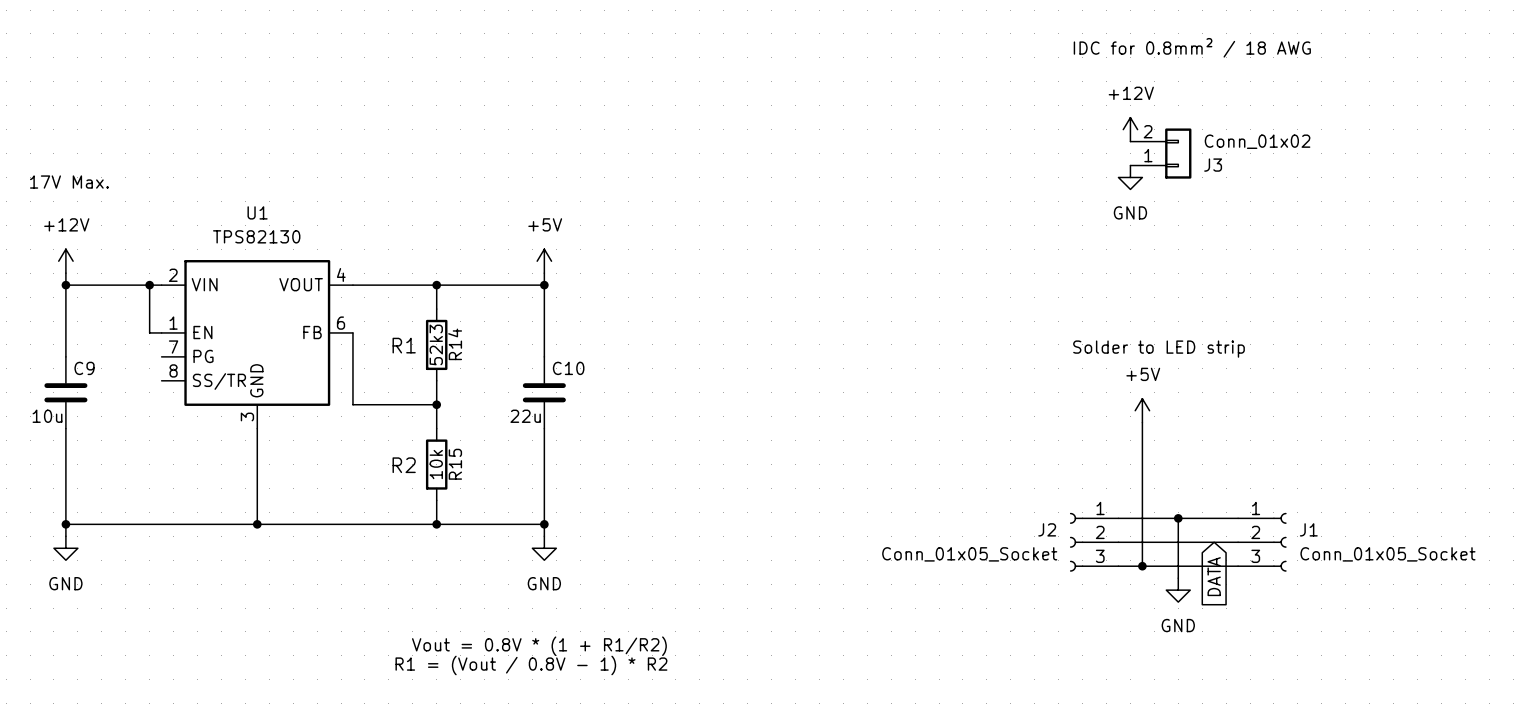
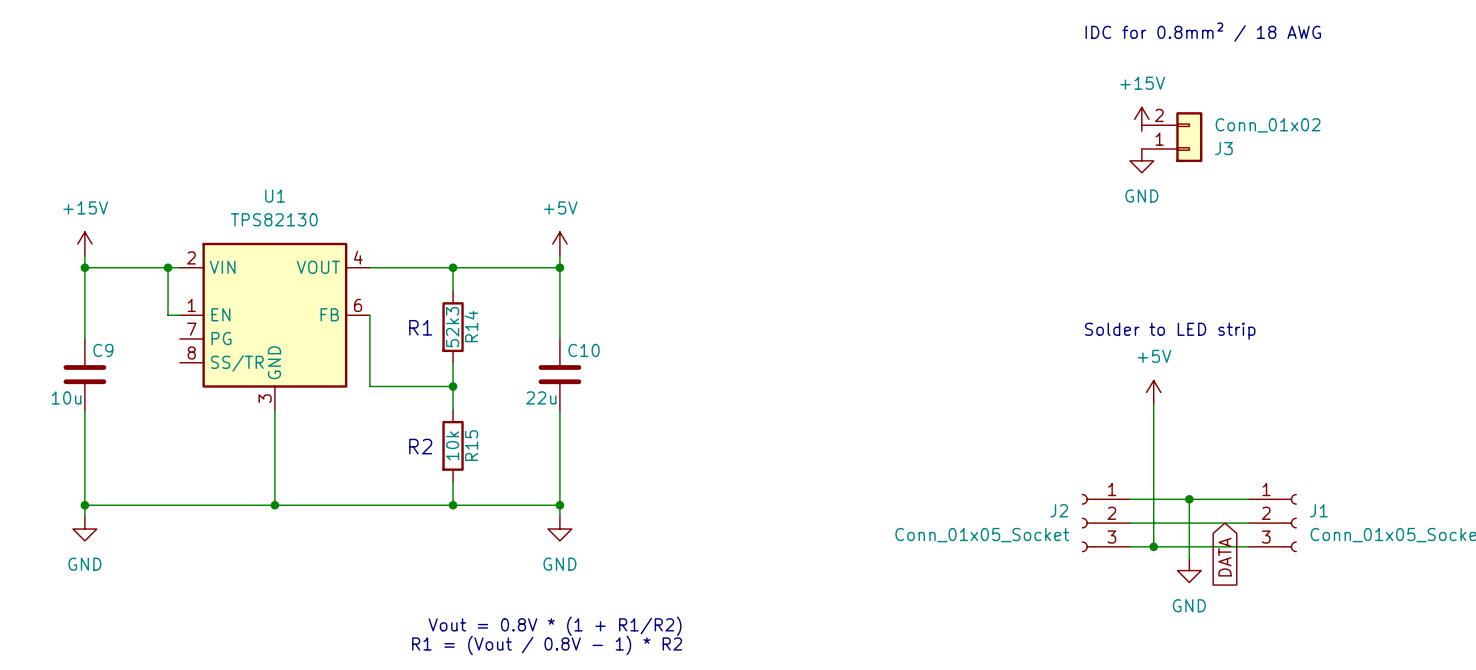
power symbol: +12V (1130, 129) -> +15V (1141, 119)
text: 17V Max. (69, 182) -> none
power symbol: +12V (65, 261) -> +15V (84, 243)

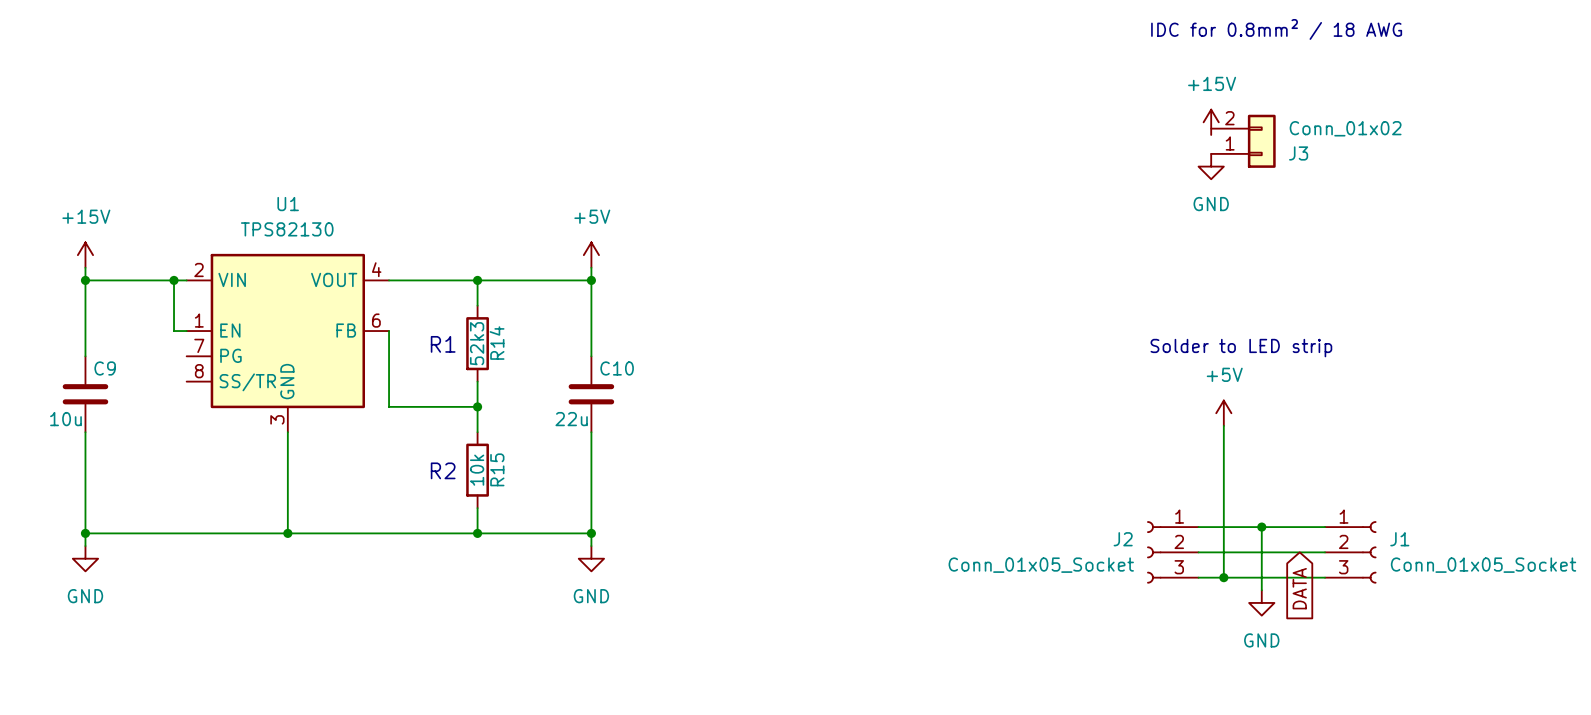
text: Vout = 0.8V * (1 + R1/R2) (555, 626) -> none
text: R1 = (Vout / 0.8V - 1) * R2 (547, 645) -> none

